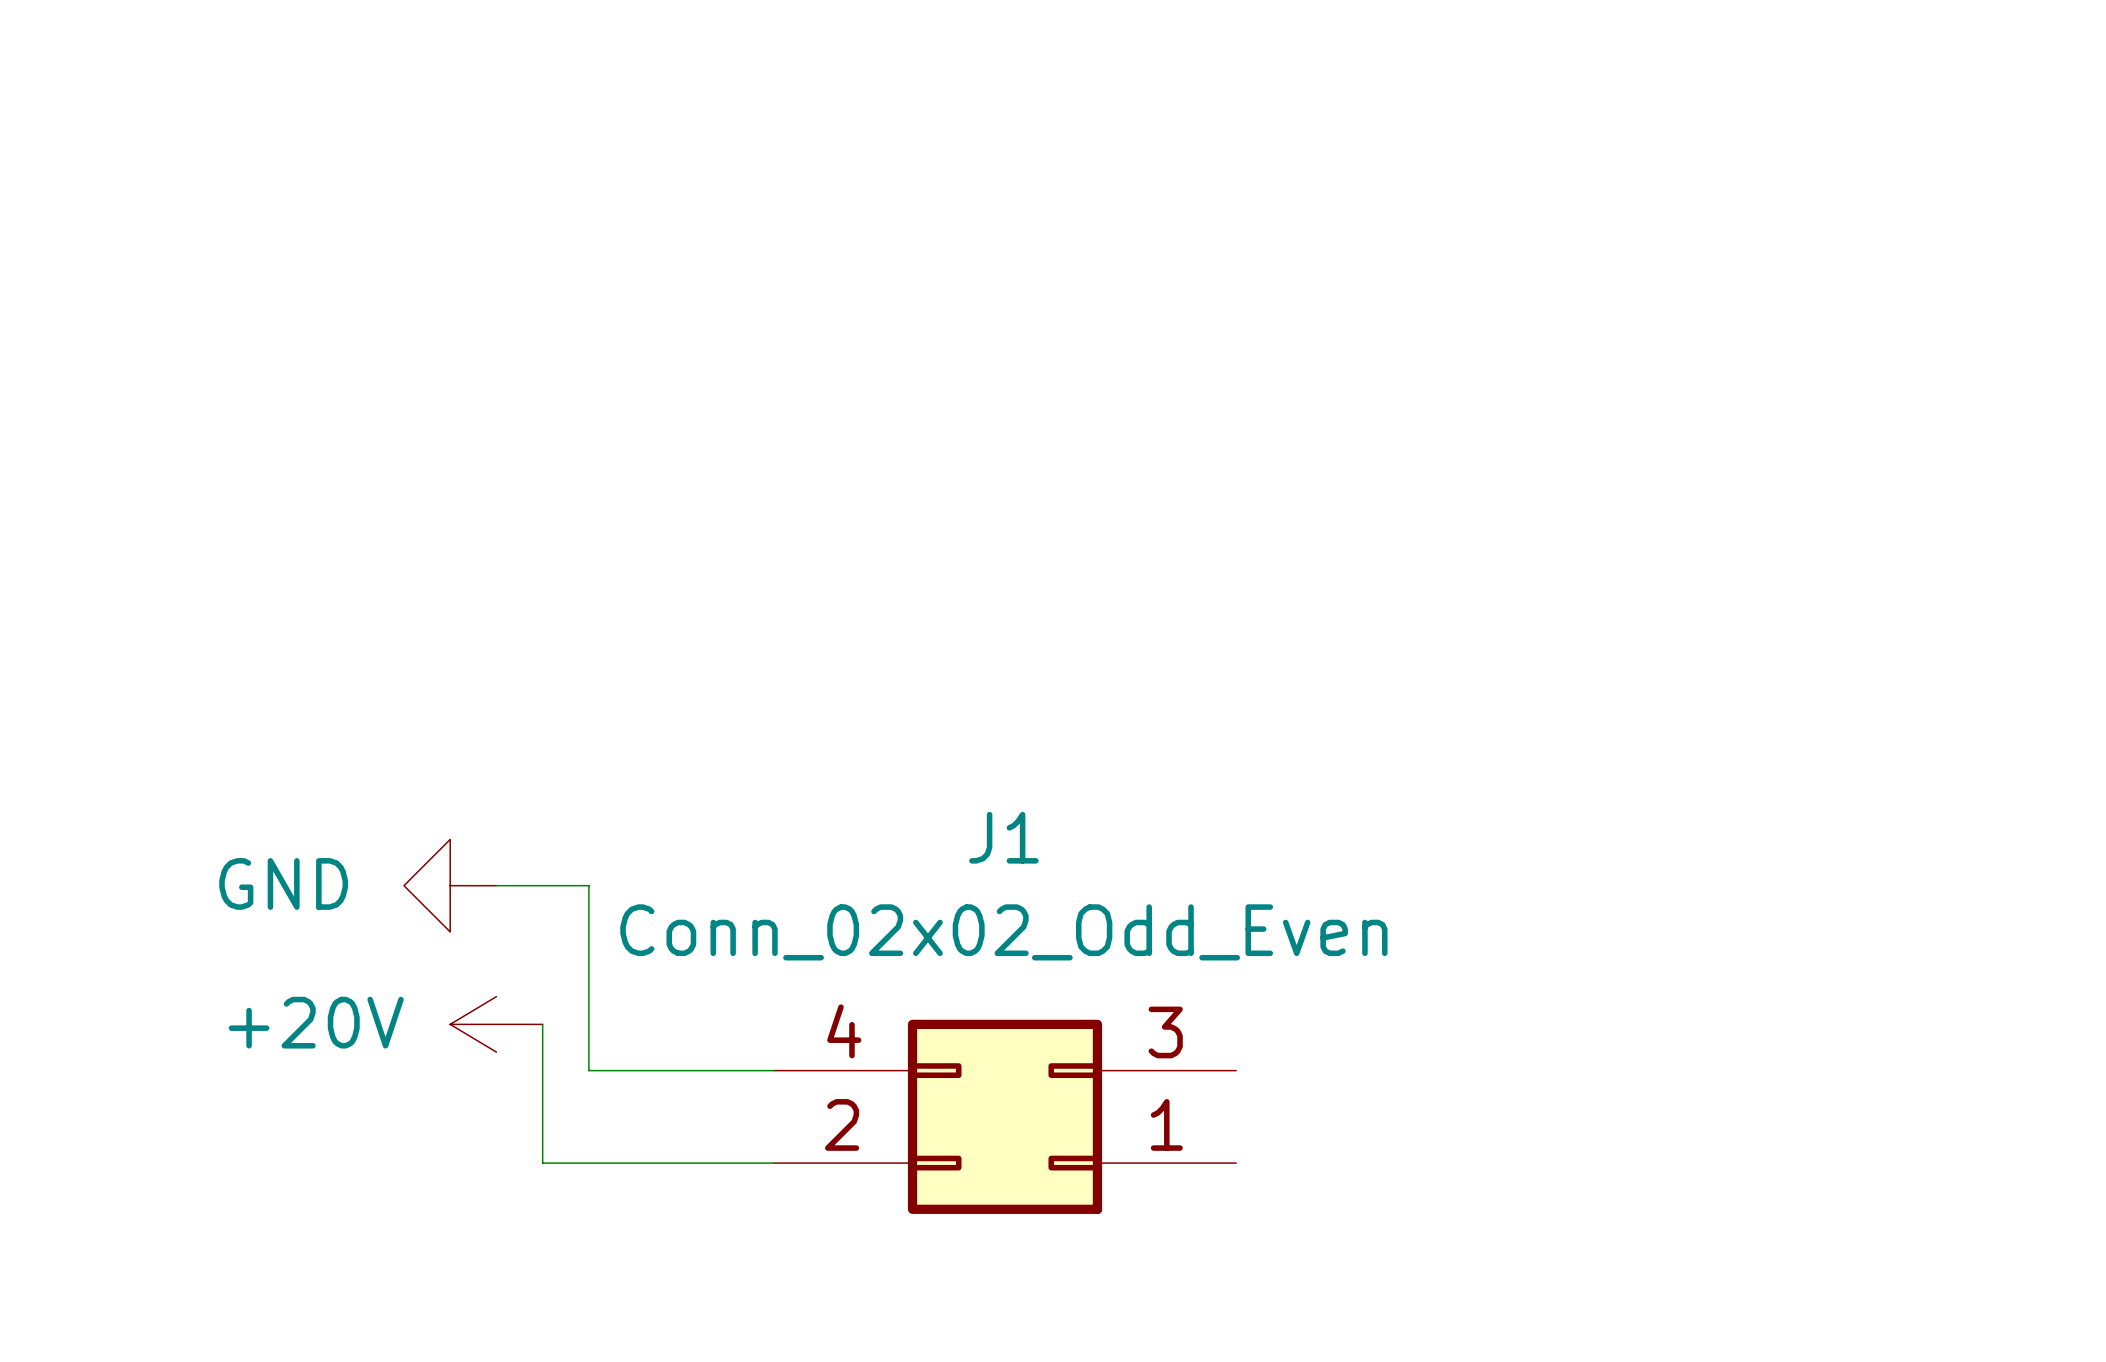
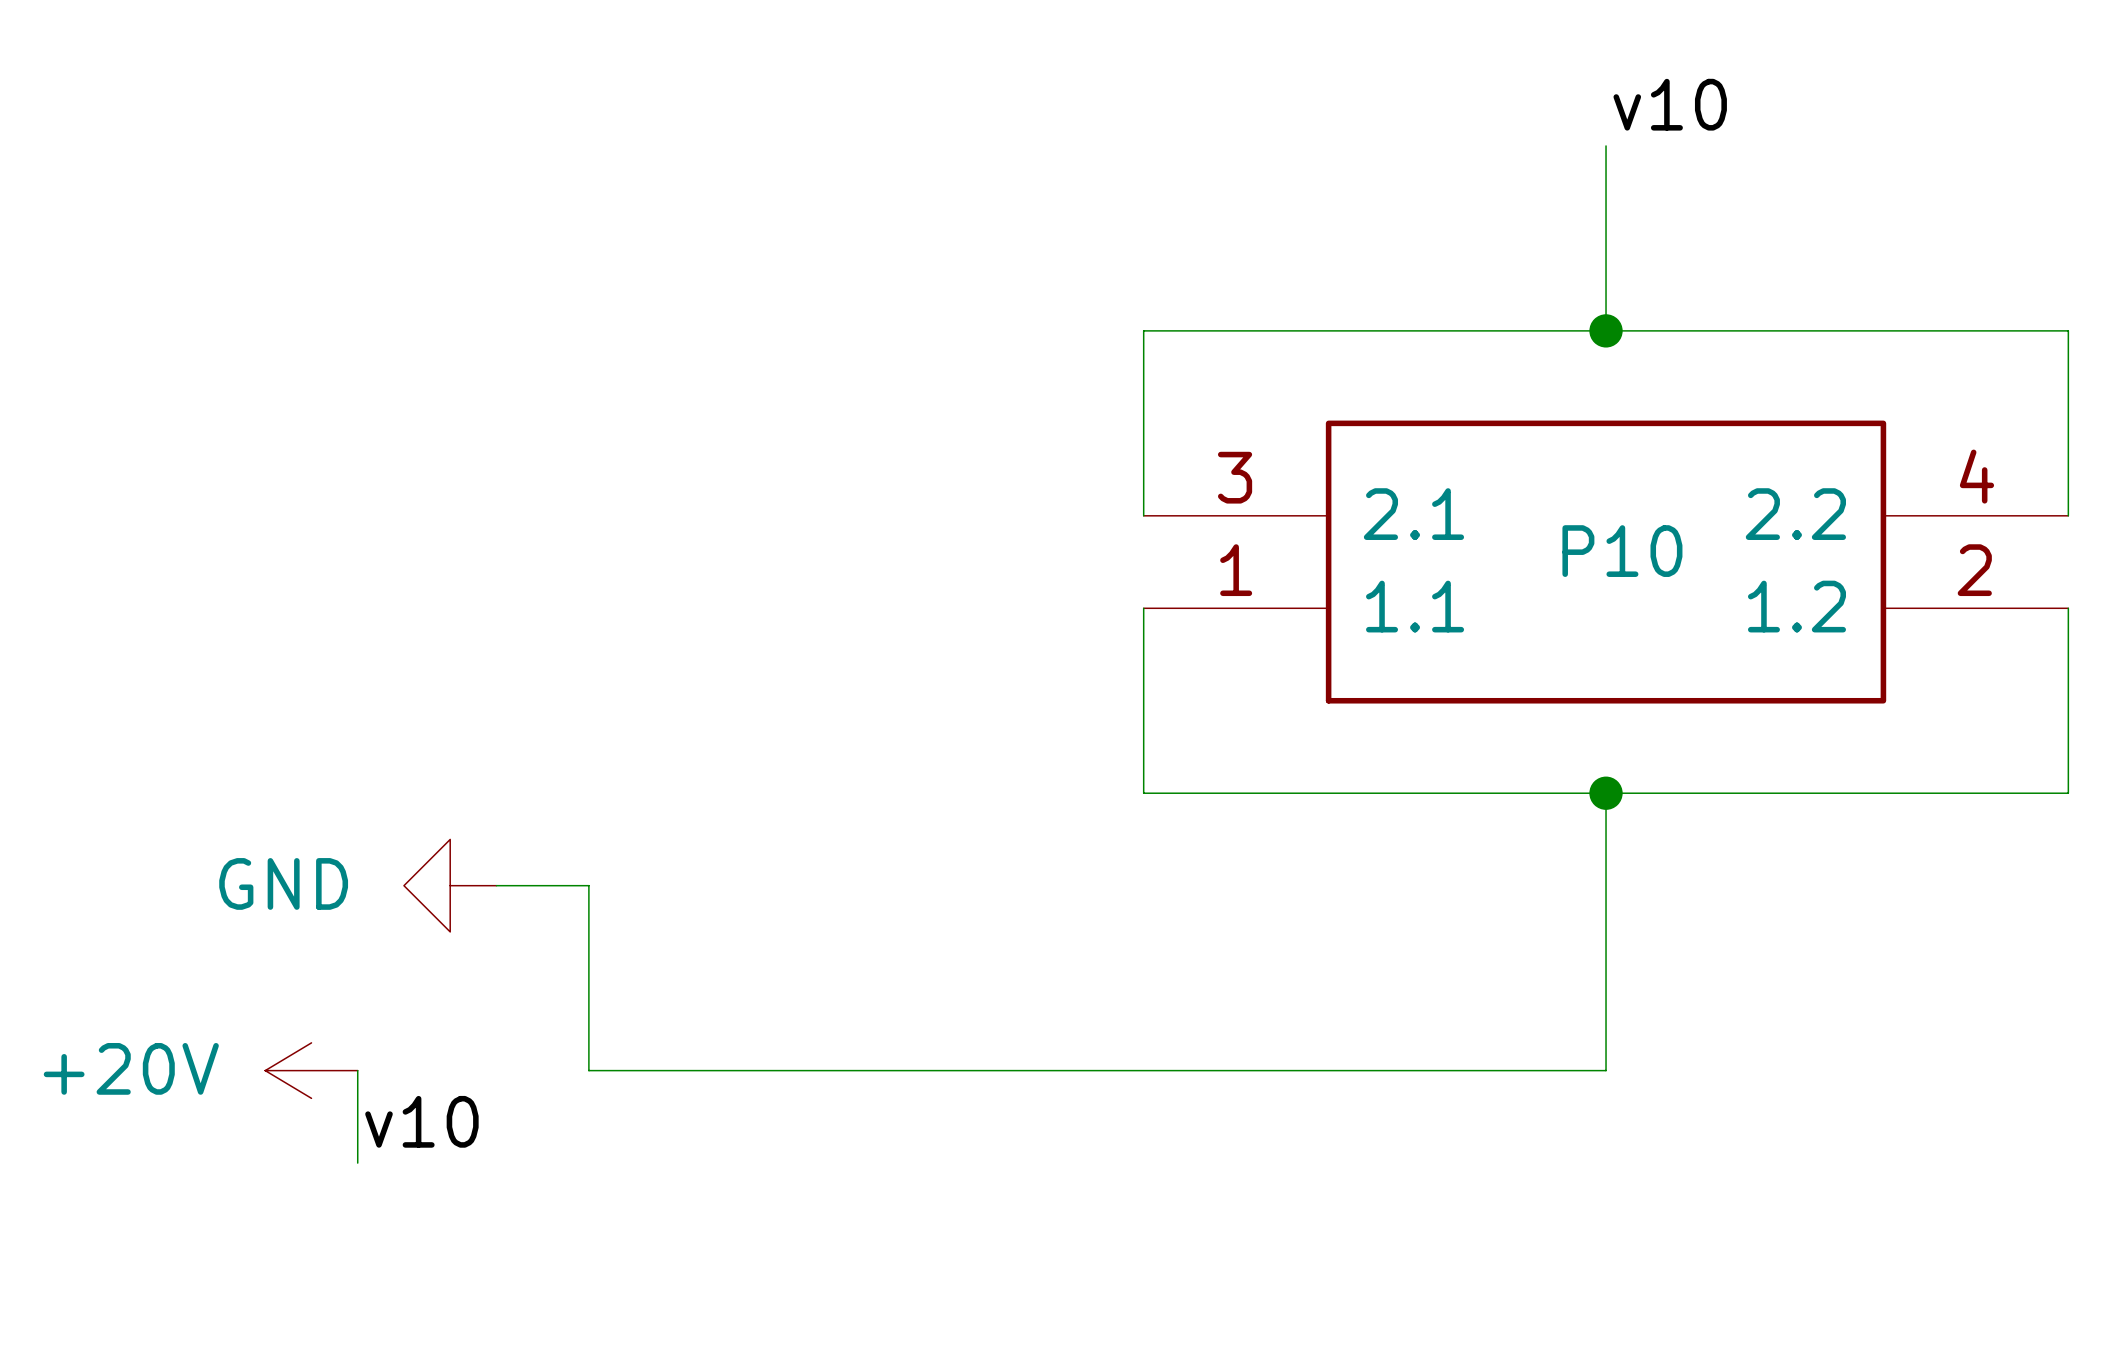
label: none -> v10 (1670, 104)
wire: none -> (1606, 145) (1606, 330)
junction: none -> (1606, 330)
wire: none -> (1143, 515) (1143, 330) (2068, 330) (2068, 515)
P10: none -> (1606, 562)
wire: none -> (1143, 608) (1143, 793) (2068, 793) (2068, 608)
wire: none -> (1606, 793) (1606, 1070) (773, 1070)
junction: none -> (1606, 793)
power symbol position: +20V (496, 1024) -> +20V (311, 1070)
wire: (542, 1024) (542, 1163) (773, 1163) -> none
wire: none -> (357, 1070) (357, 1163)
J1: Conn_02x02_Odd_Even (1004, 1116) -> none
label: none -> v10 (421, 1121)

